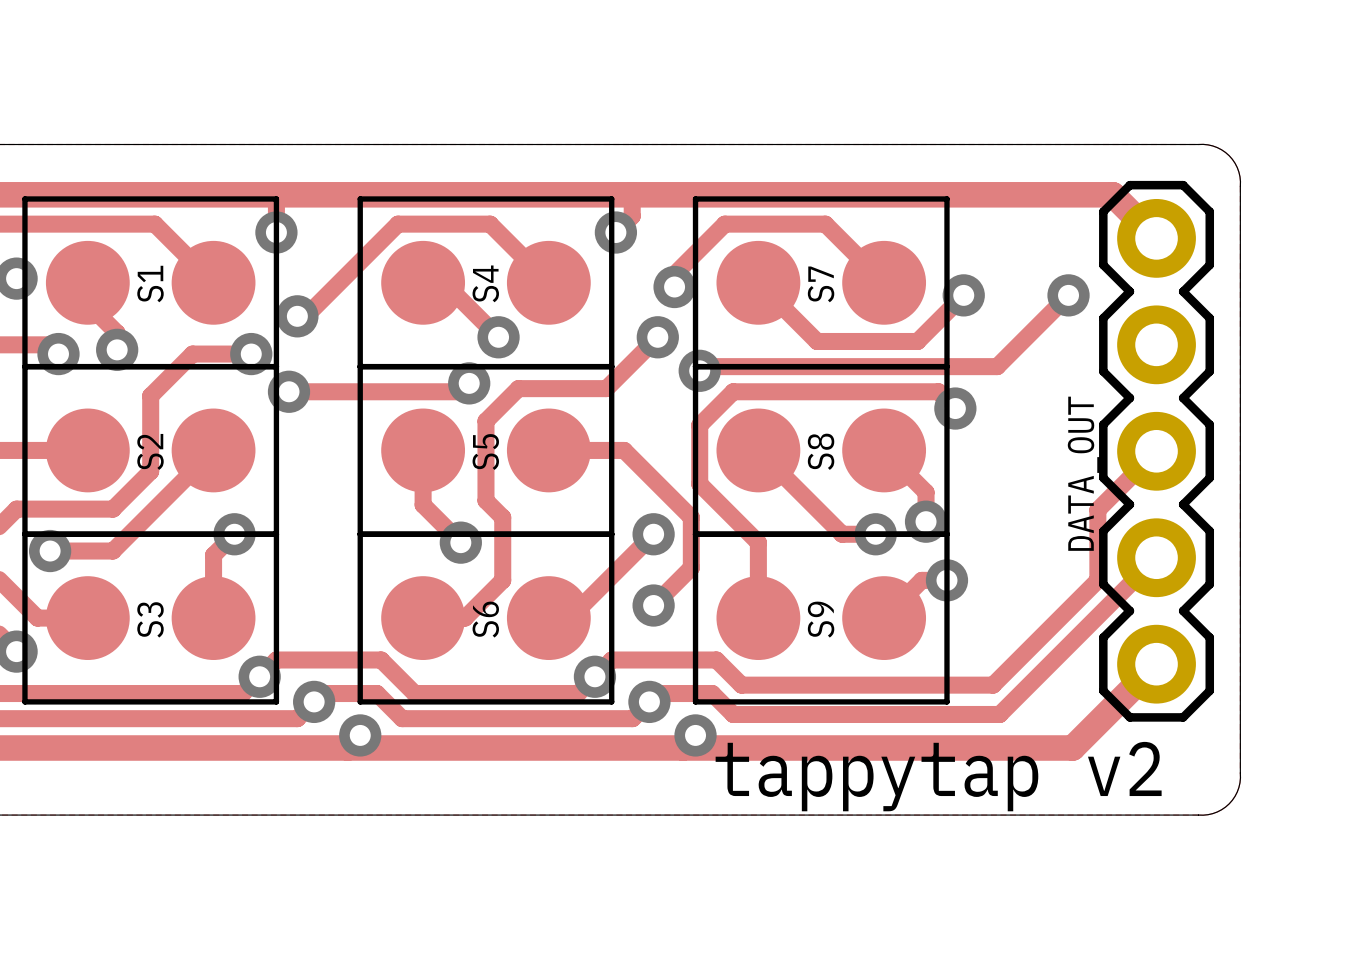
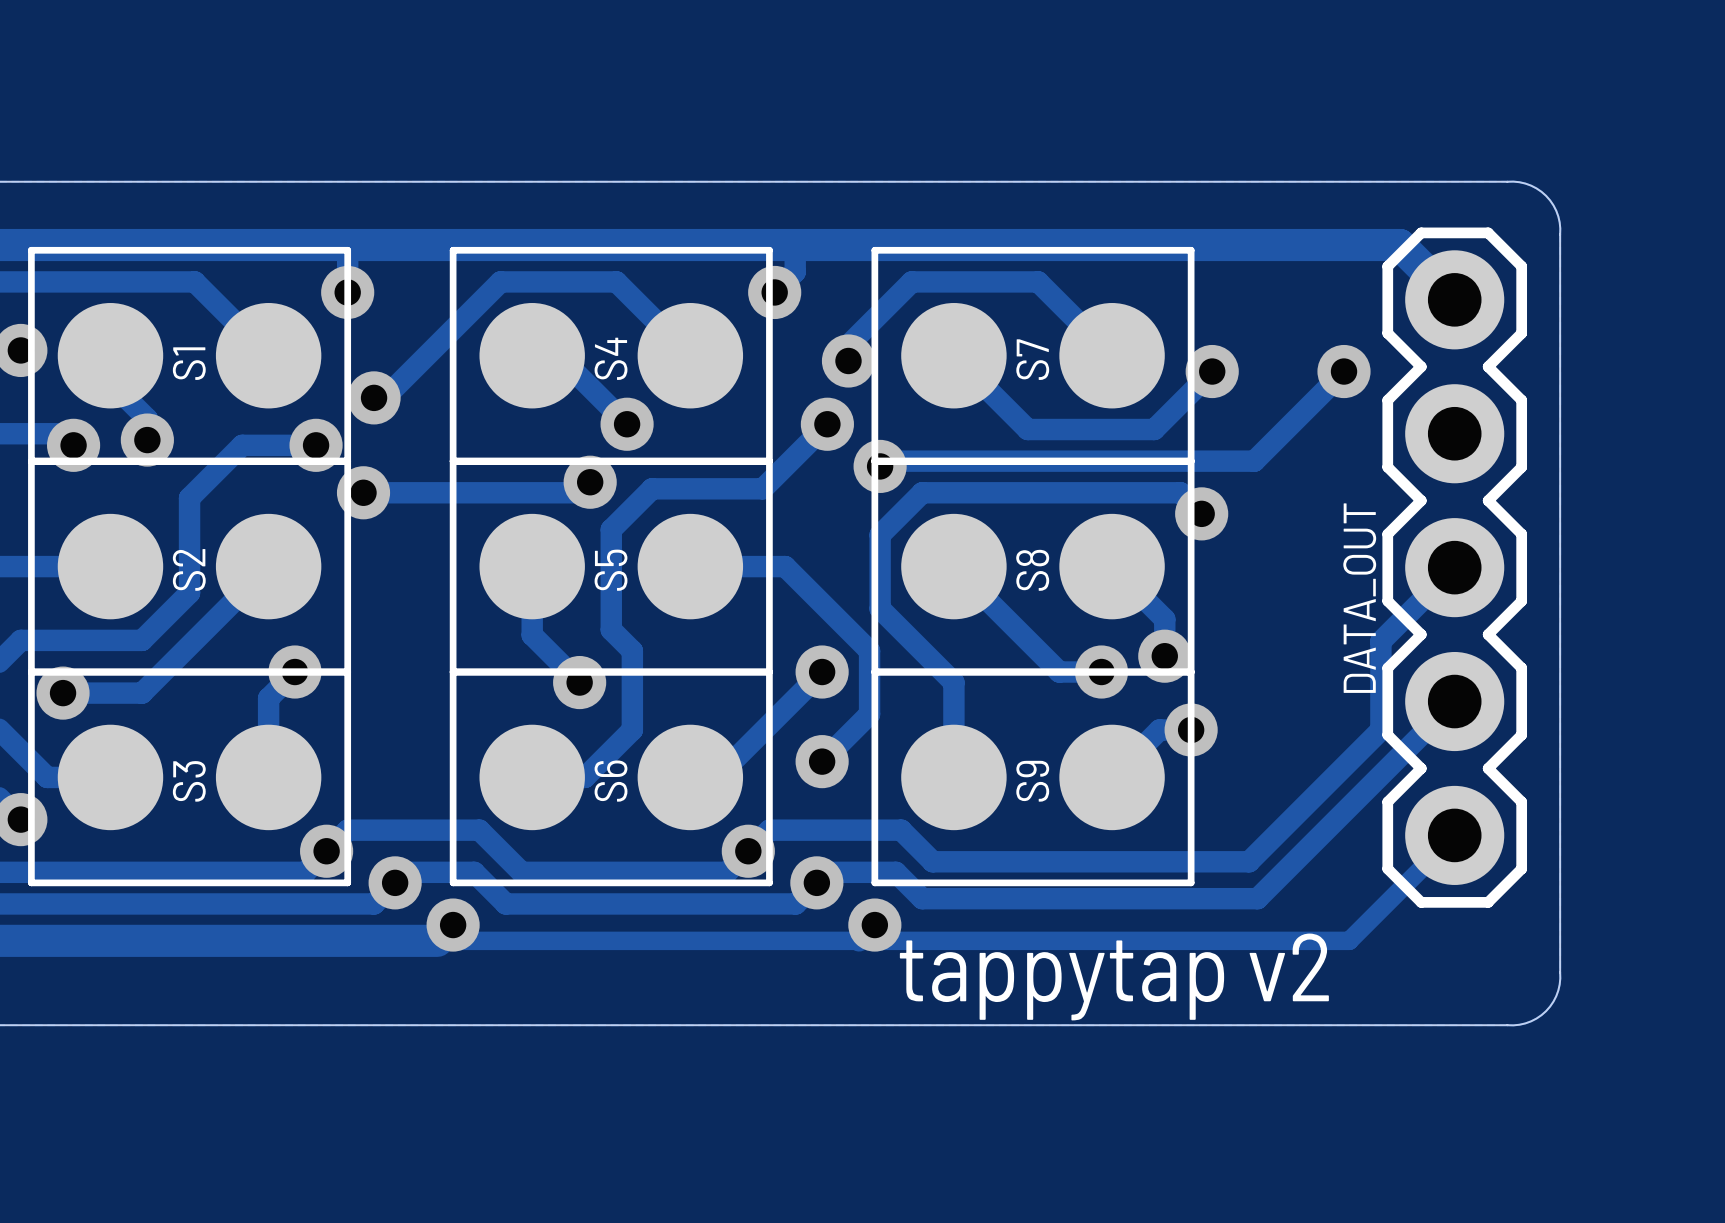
track width: thick (1156, 664) (1072, 748) (347, 748) (360, 735) -> thin (1454, 835) (1349, 940) (437, 940) (453, 925)

